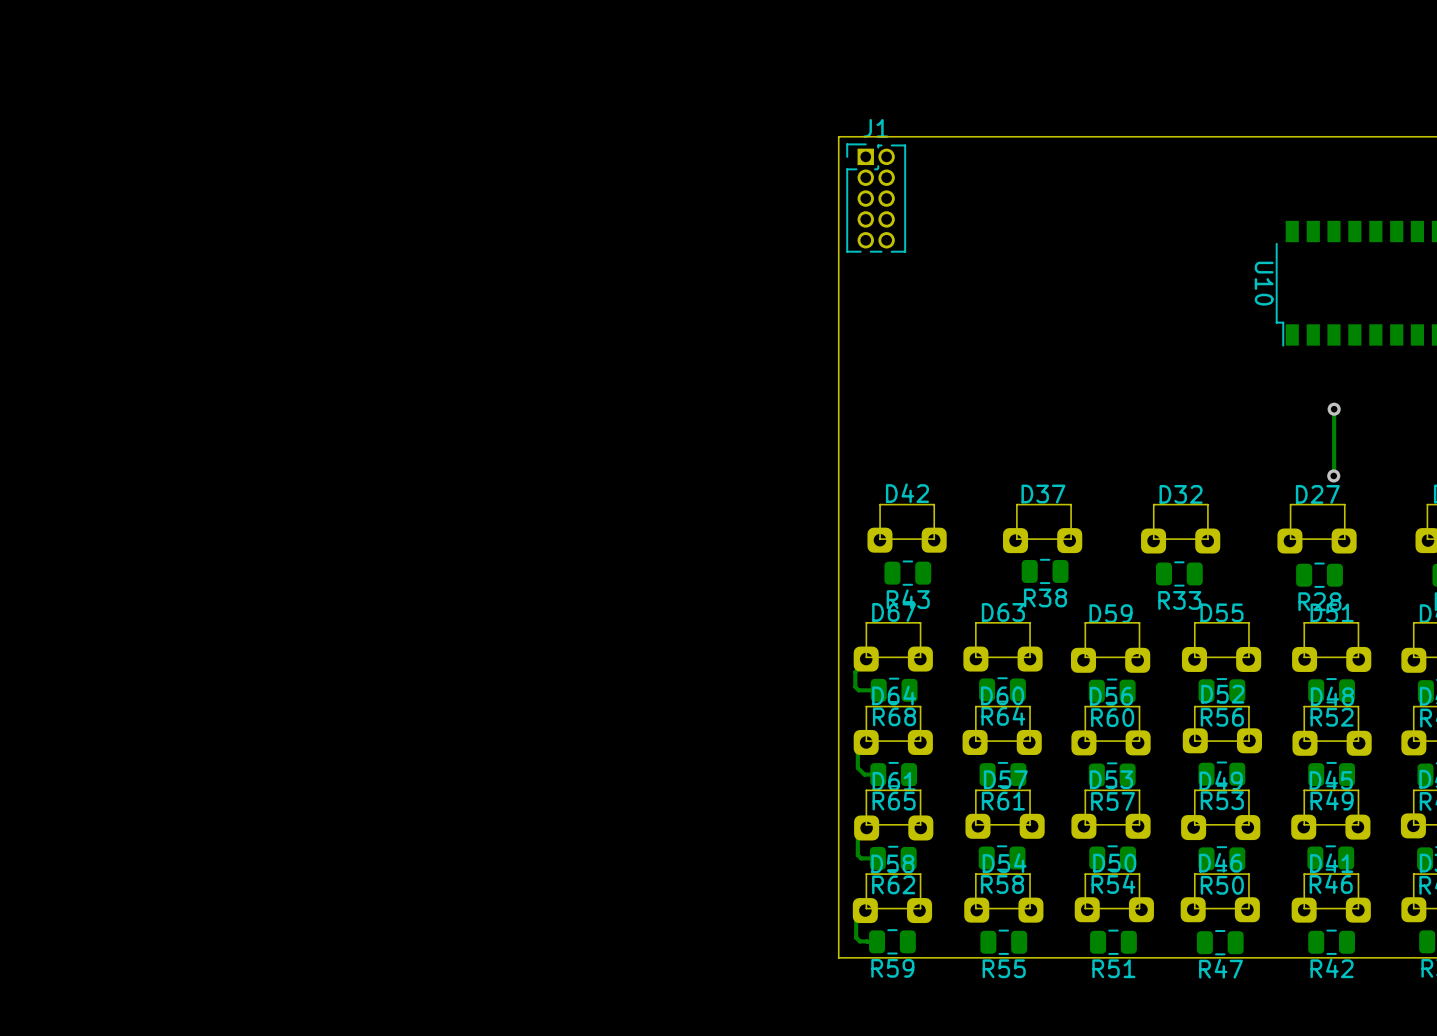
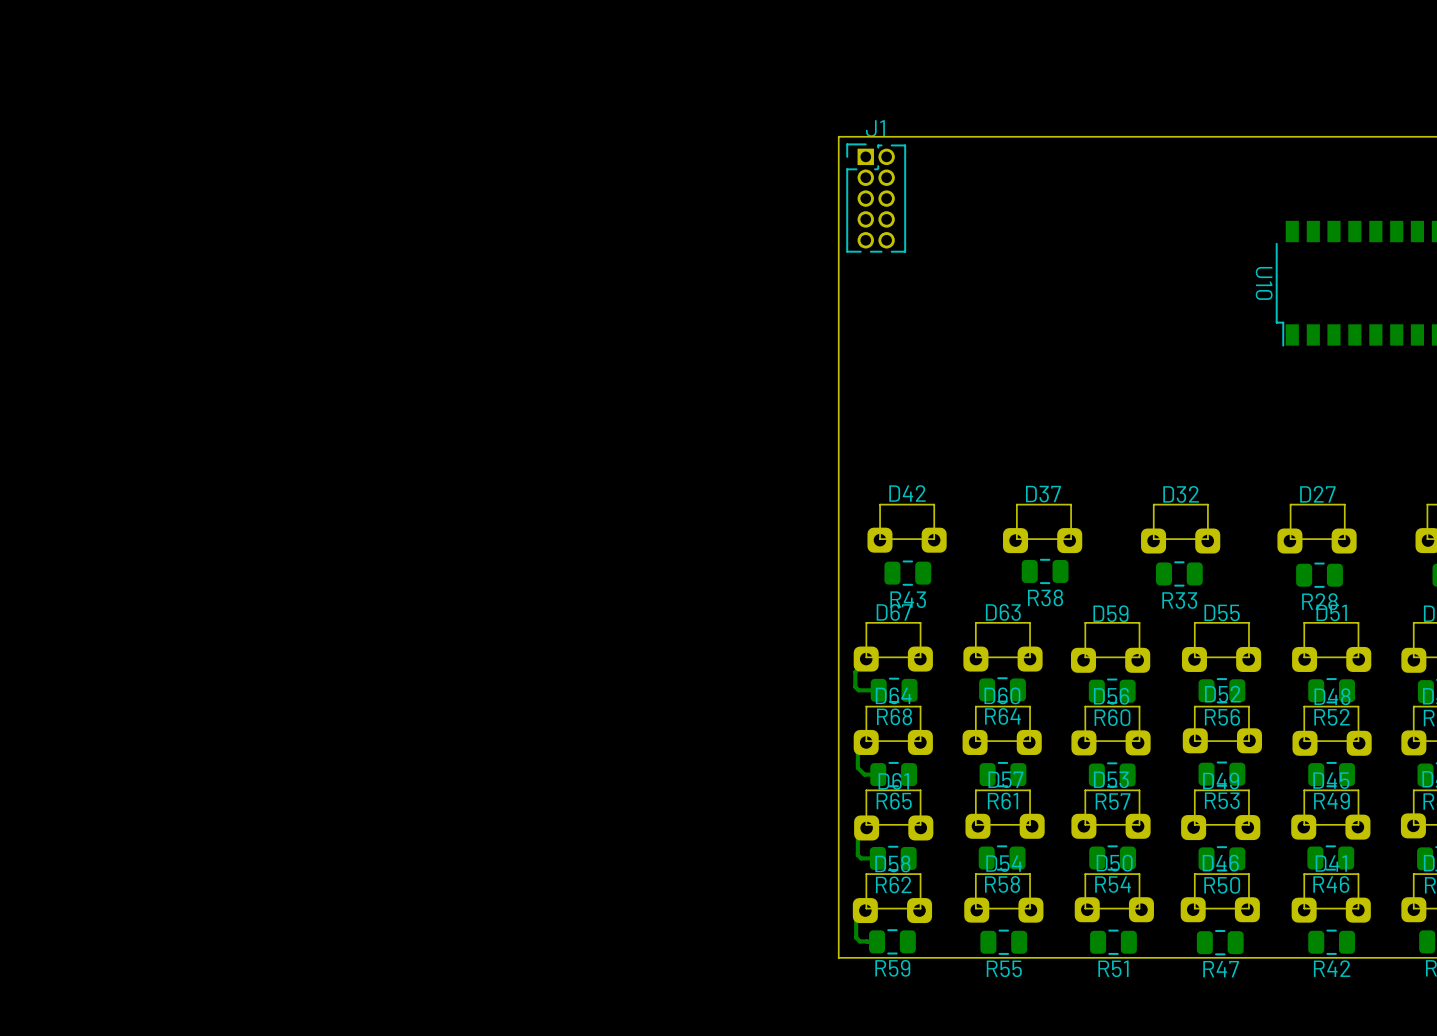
track: (1334, 409) (1333, 475) -> none
via: (1334, 409) -> none
via: (1333, 475) -> none

